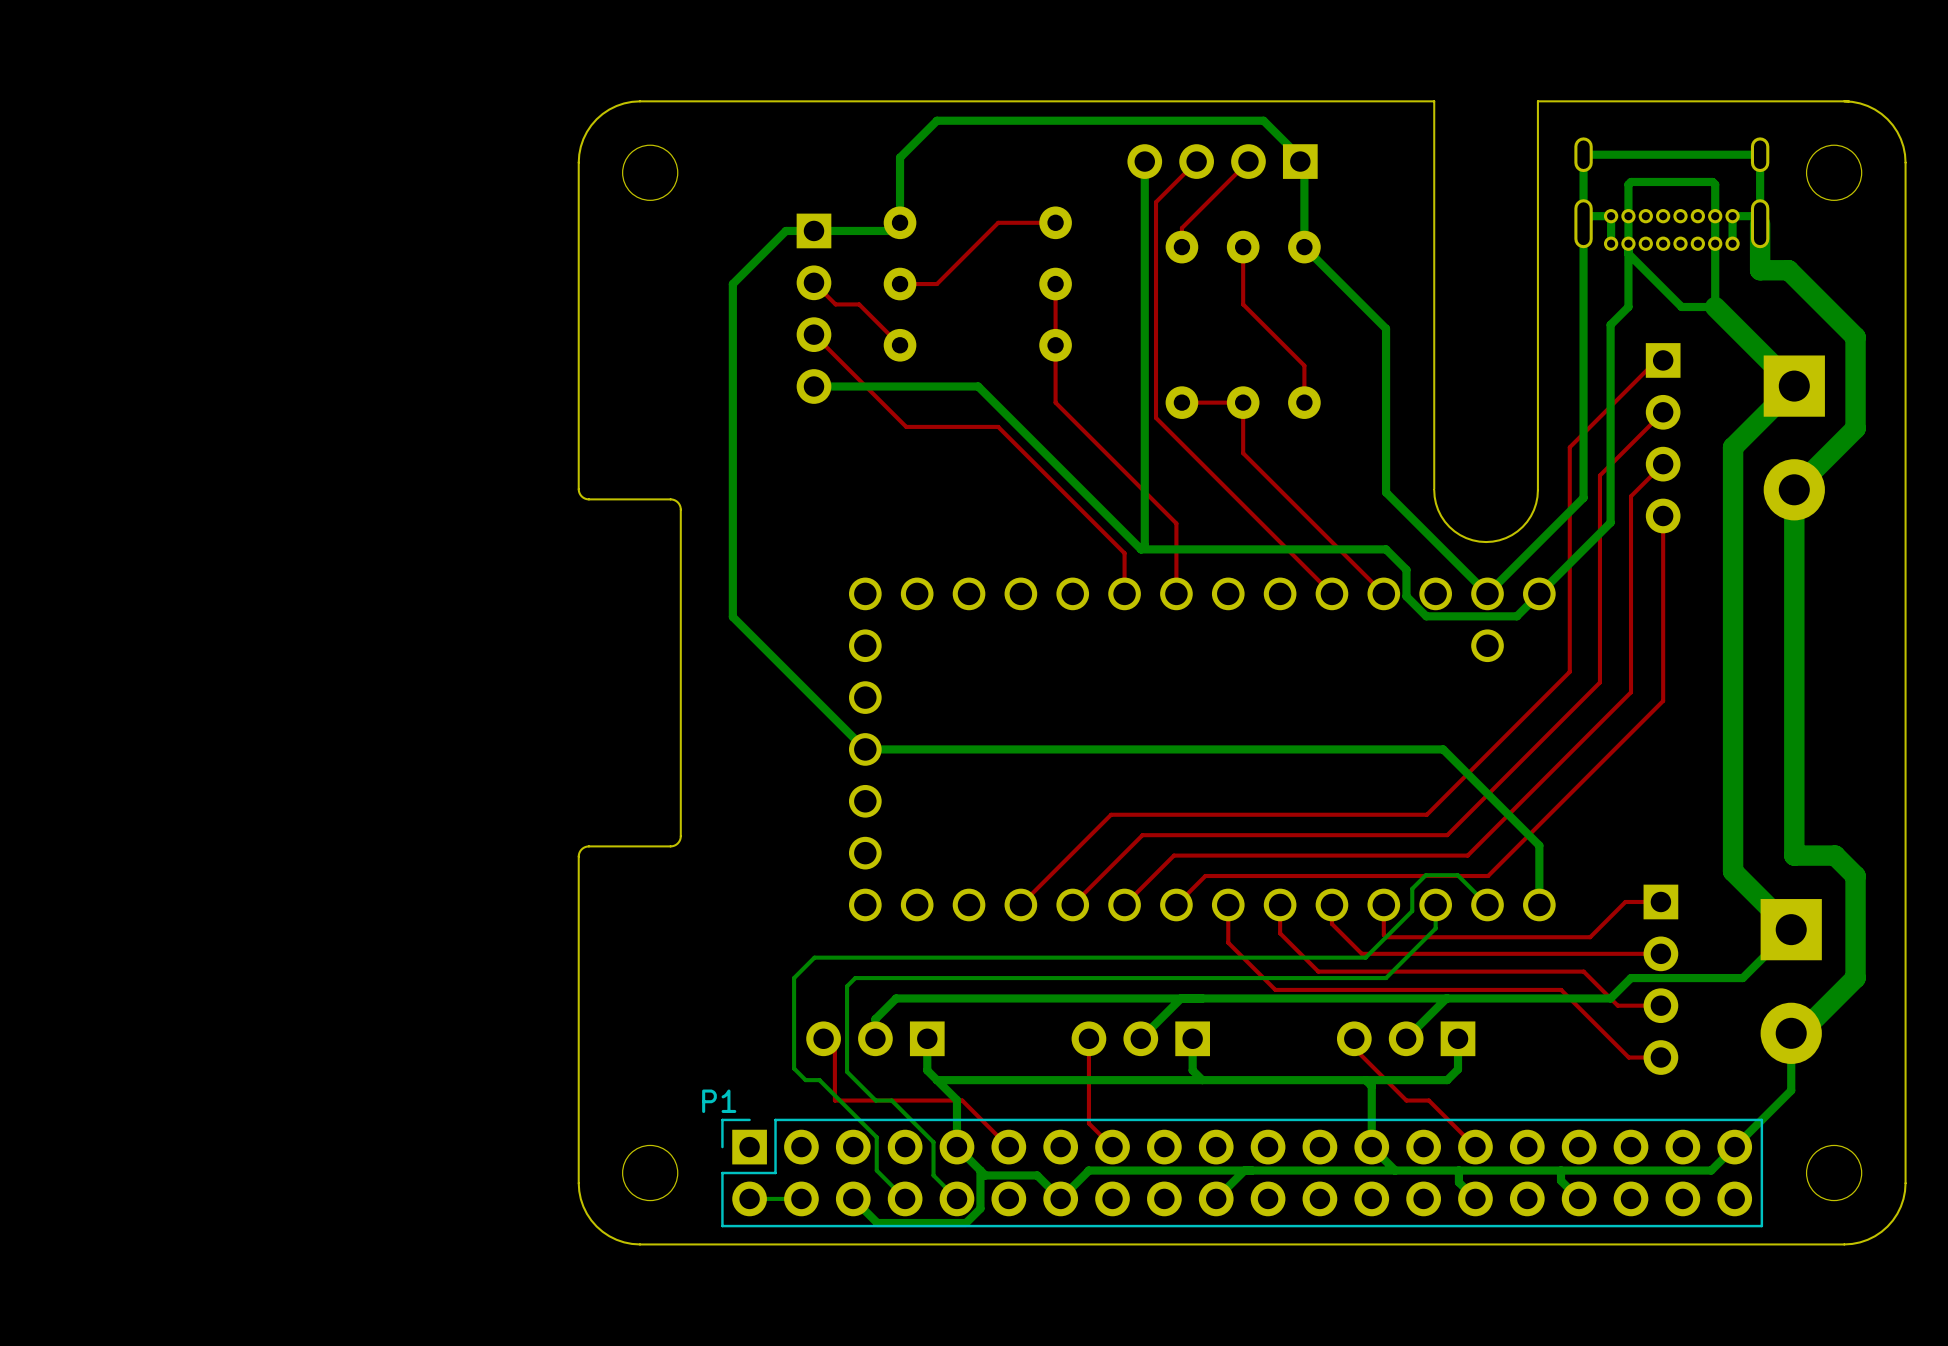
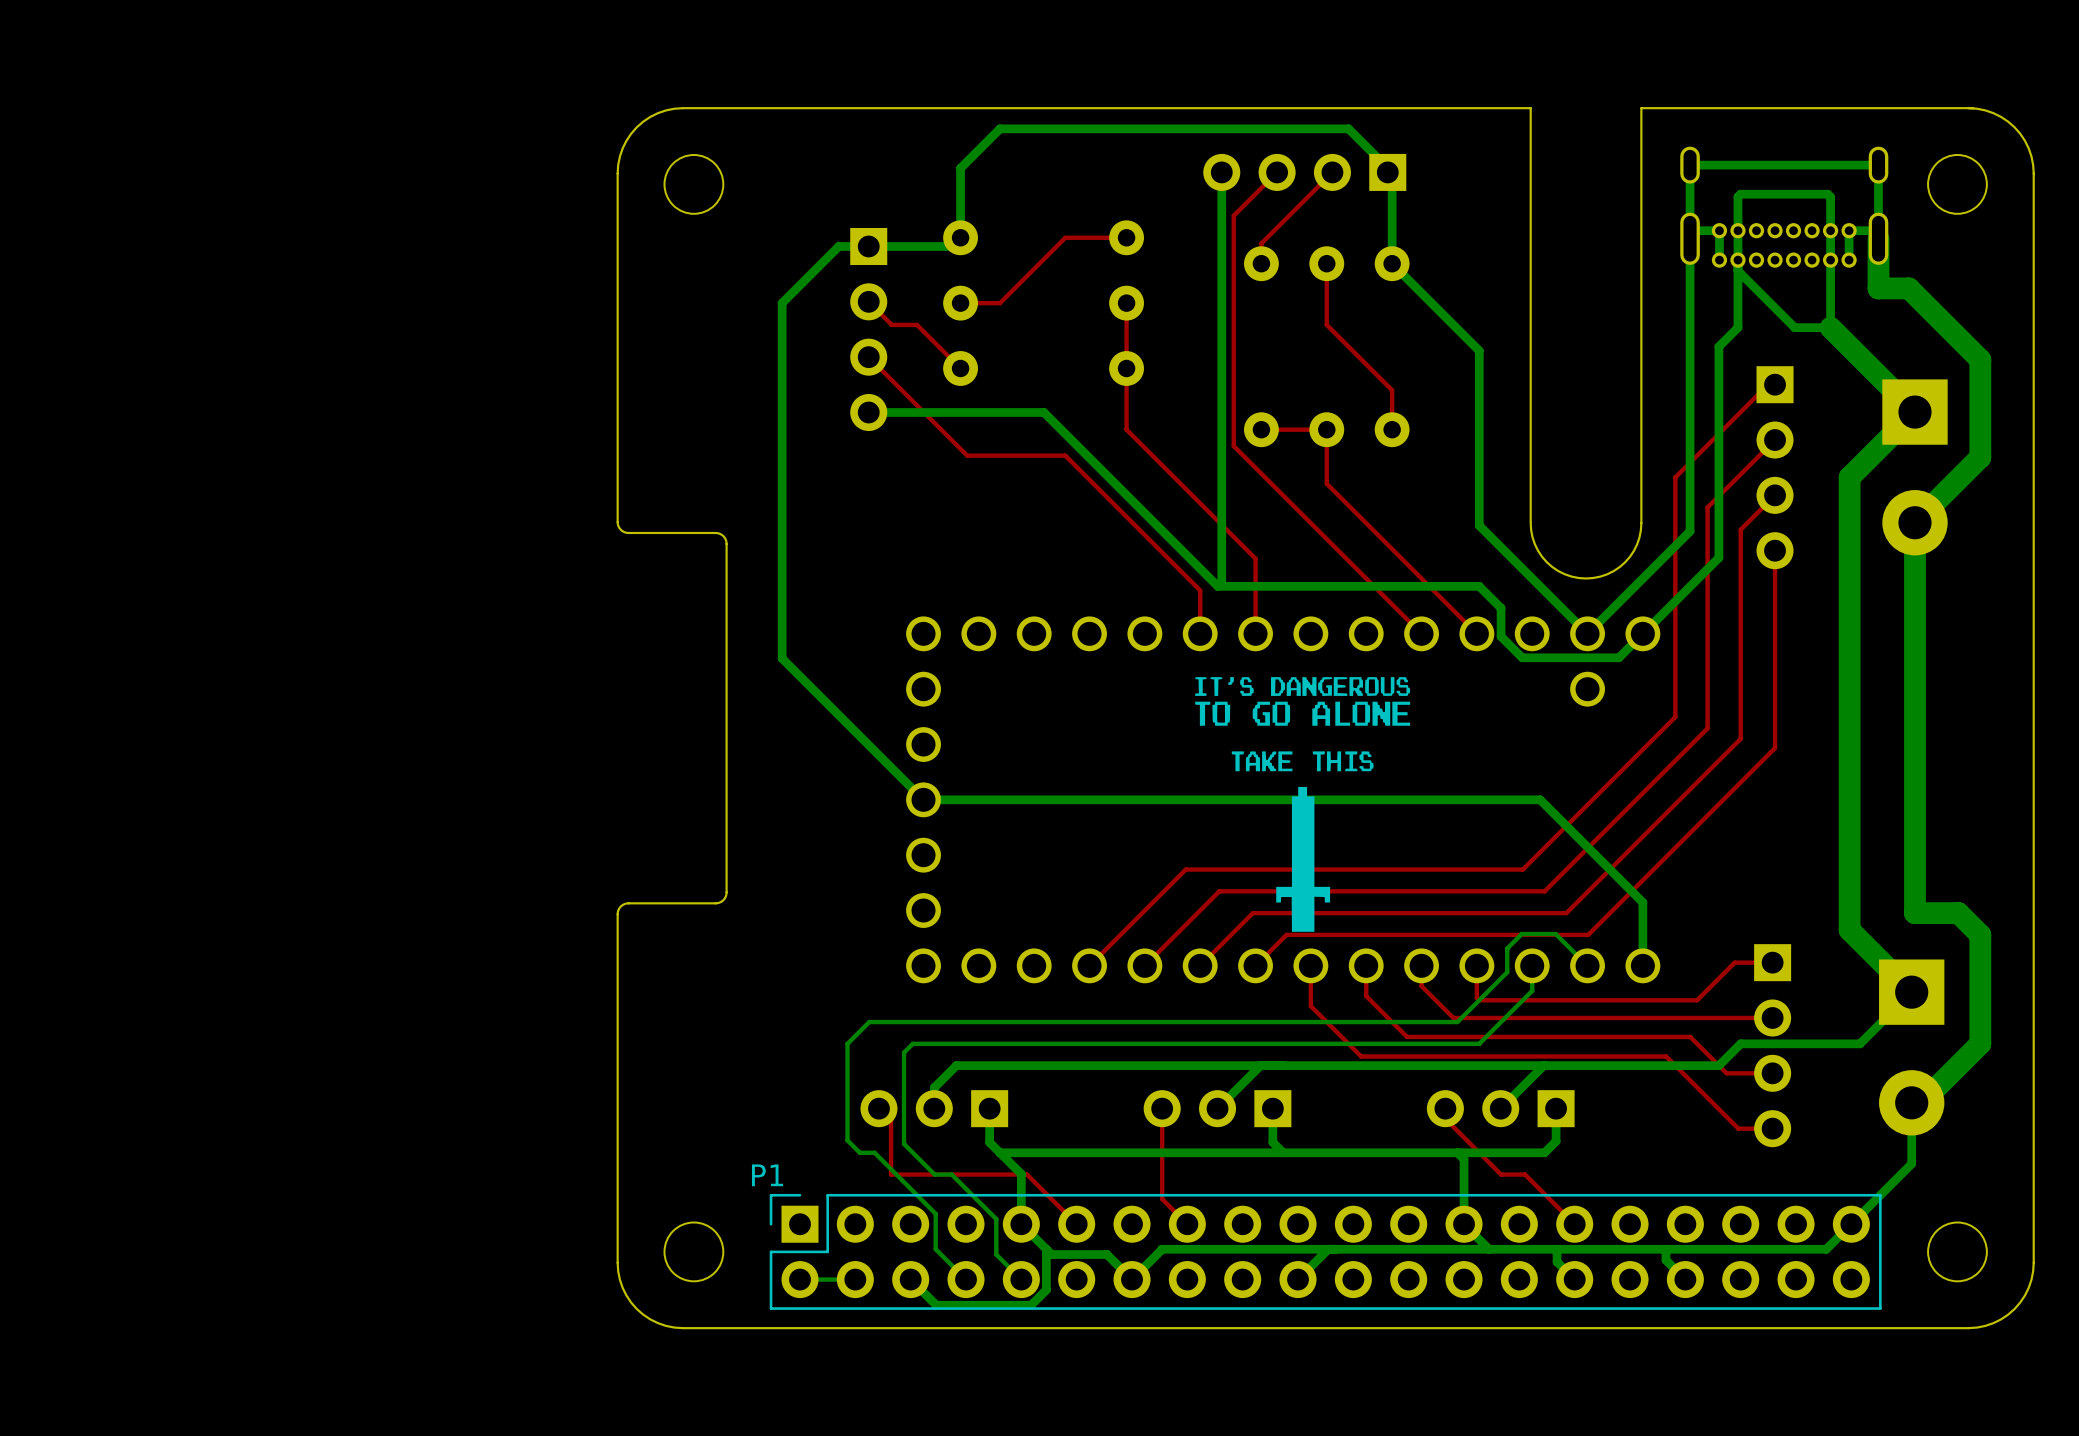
drawing: none -> [1195, 677, 1411, 932]

